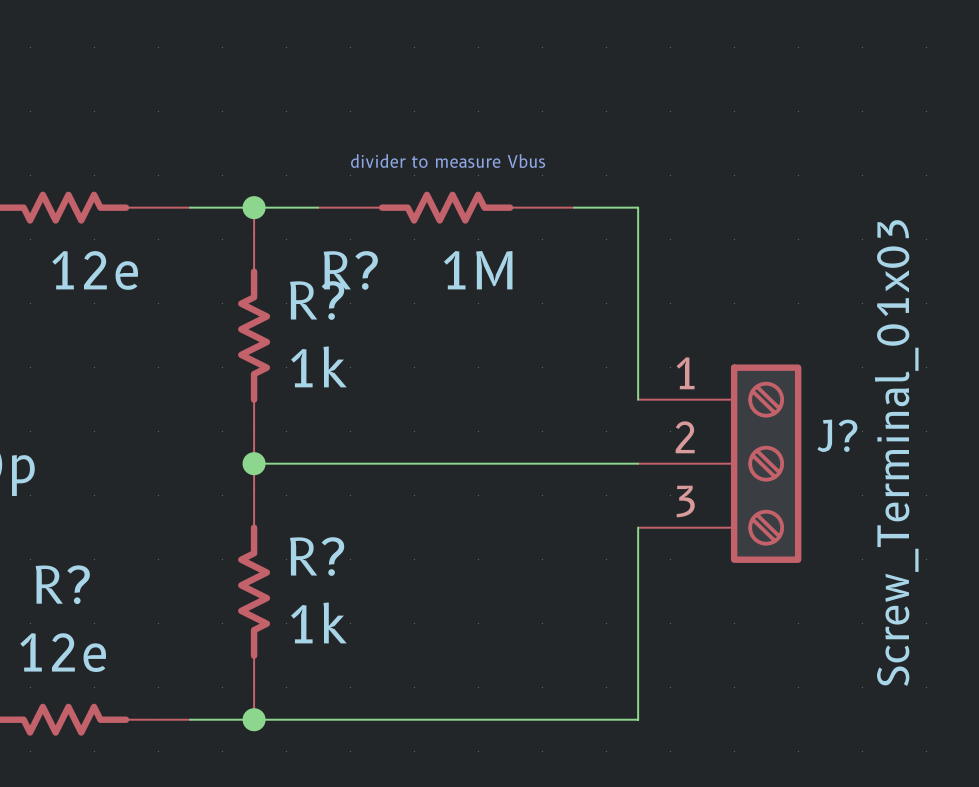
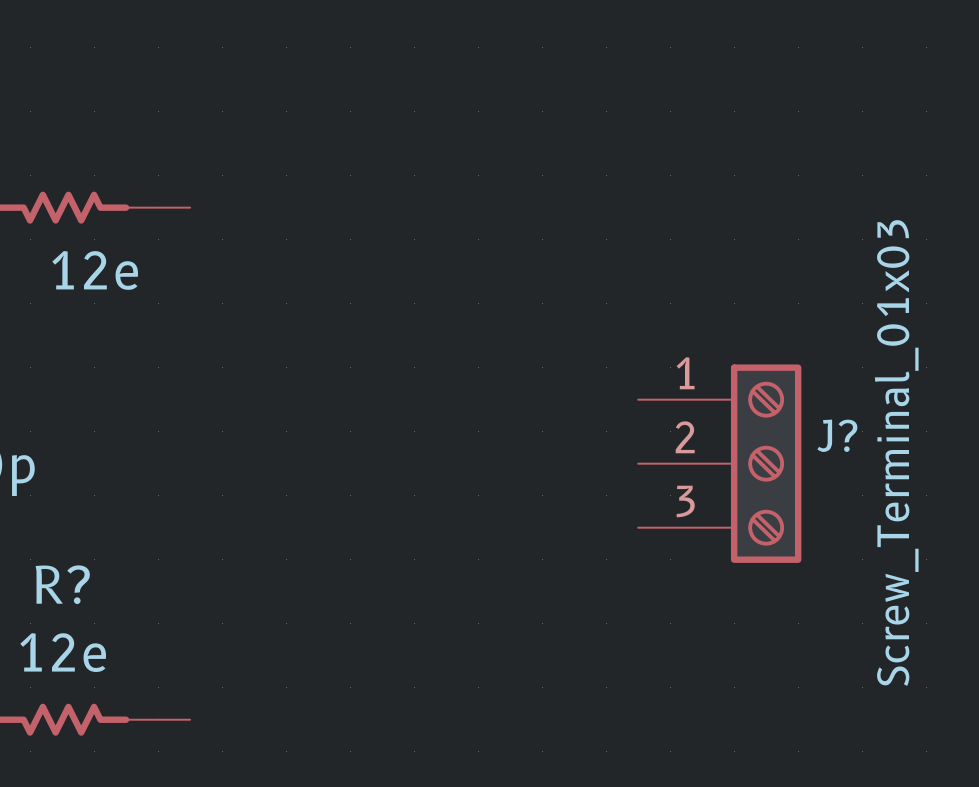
text: divider to measure Vbus (448, 161) -> none
wire: (190, 207) (318, 207) -> none
junction: (254, 207) -> none
R?: 1M (446, 207) -> none
wire: (574, 207) (638, 207) (638, 399) -> none
R?: 1k (254, 335) -> none
wire: (254, 463) (638, 463) -> none
junction: (254, 463) -> none
wire: (638, 527) (638, 719) (190, 719) -> none
R?: 1k (254, 591) -> none
junction: (254, 719) -> none

